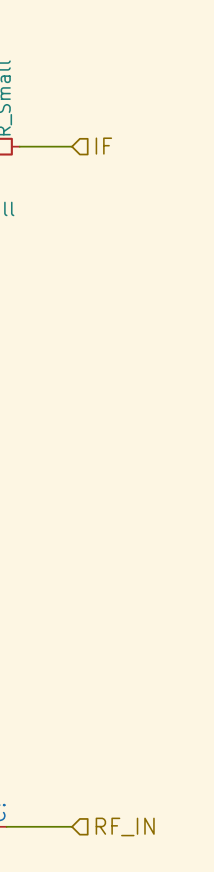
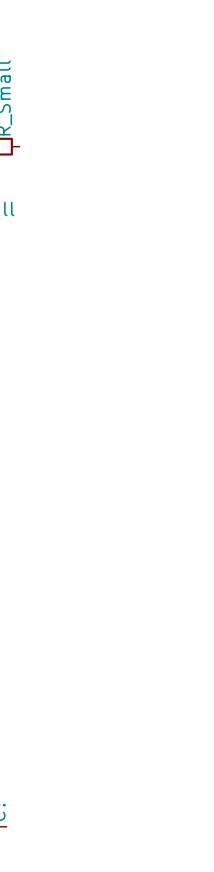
wire: (19, 146) (72, 146) -> none
hierarchical label: IF (103, 146) -> none
wire: (6, 826) (72, 826) -> none
hierarchical label: RF_IN (125, 826) -> none

